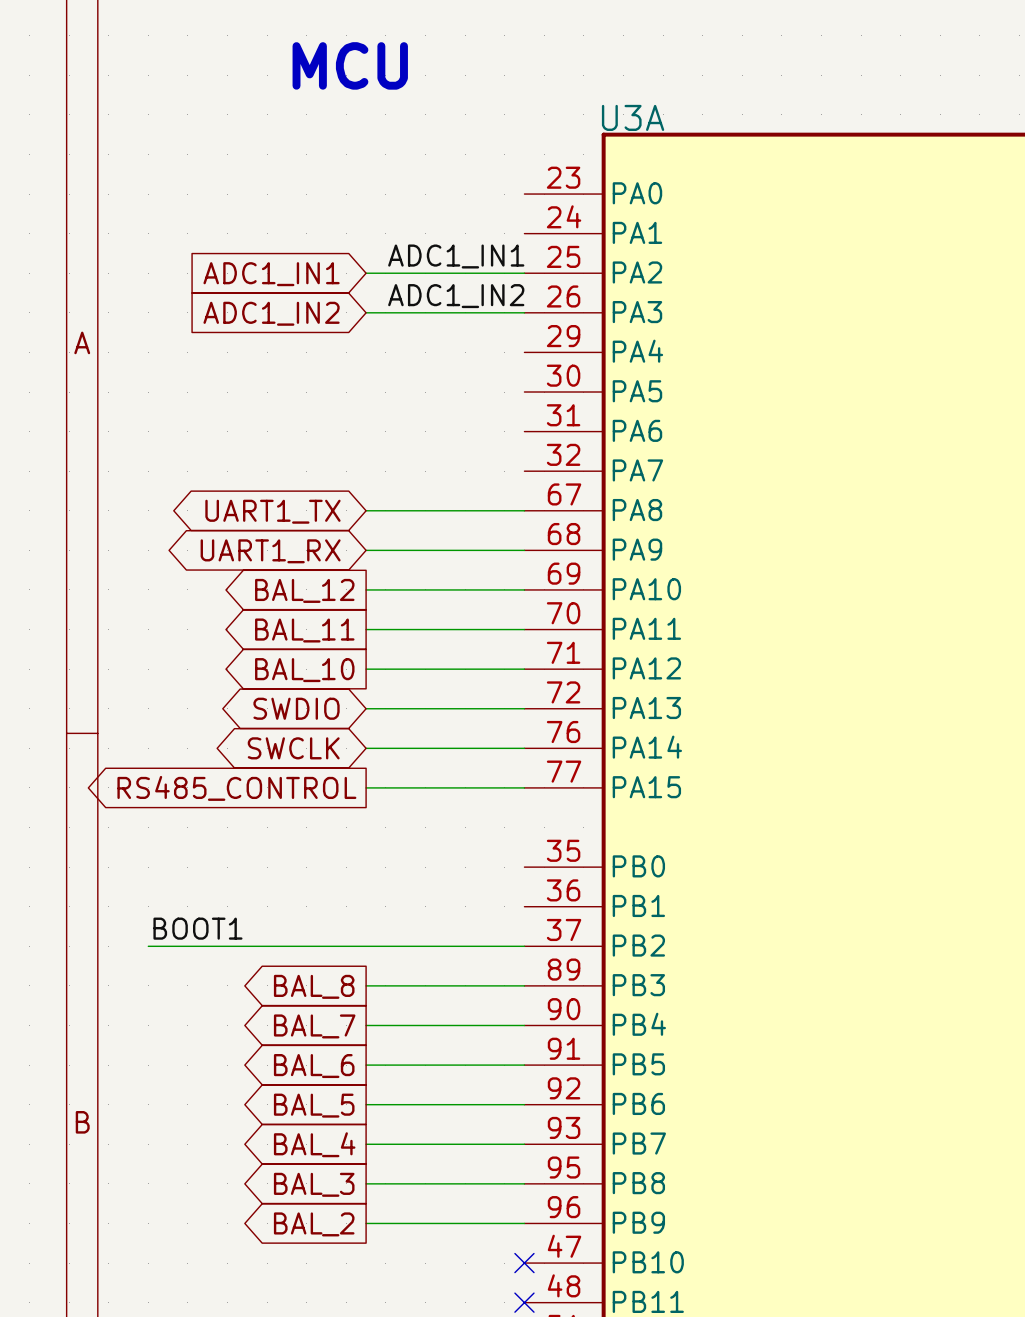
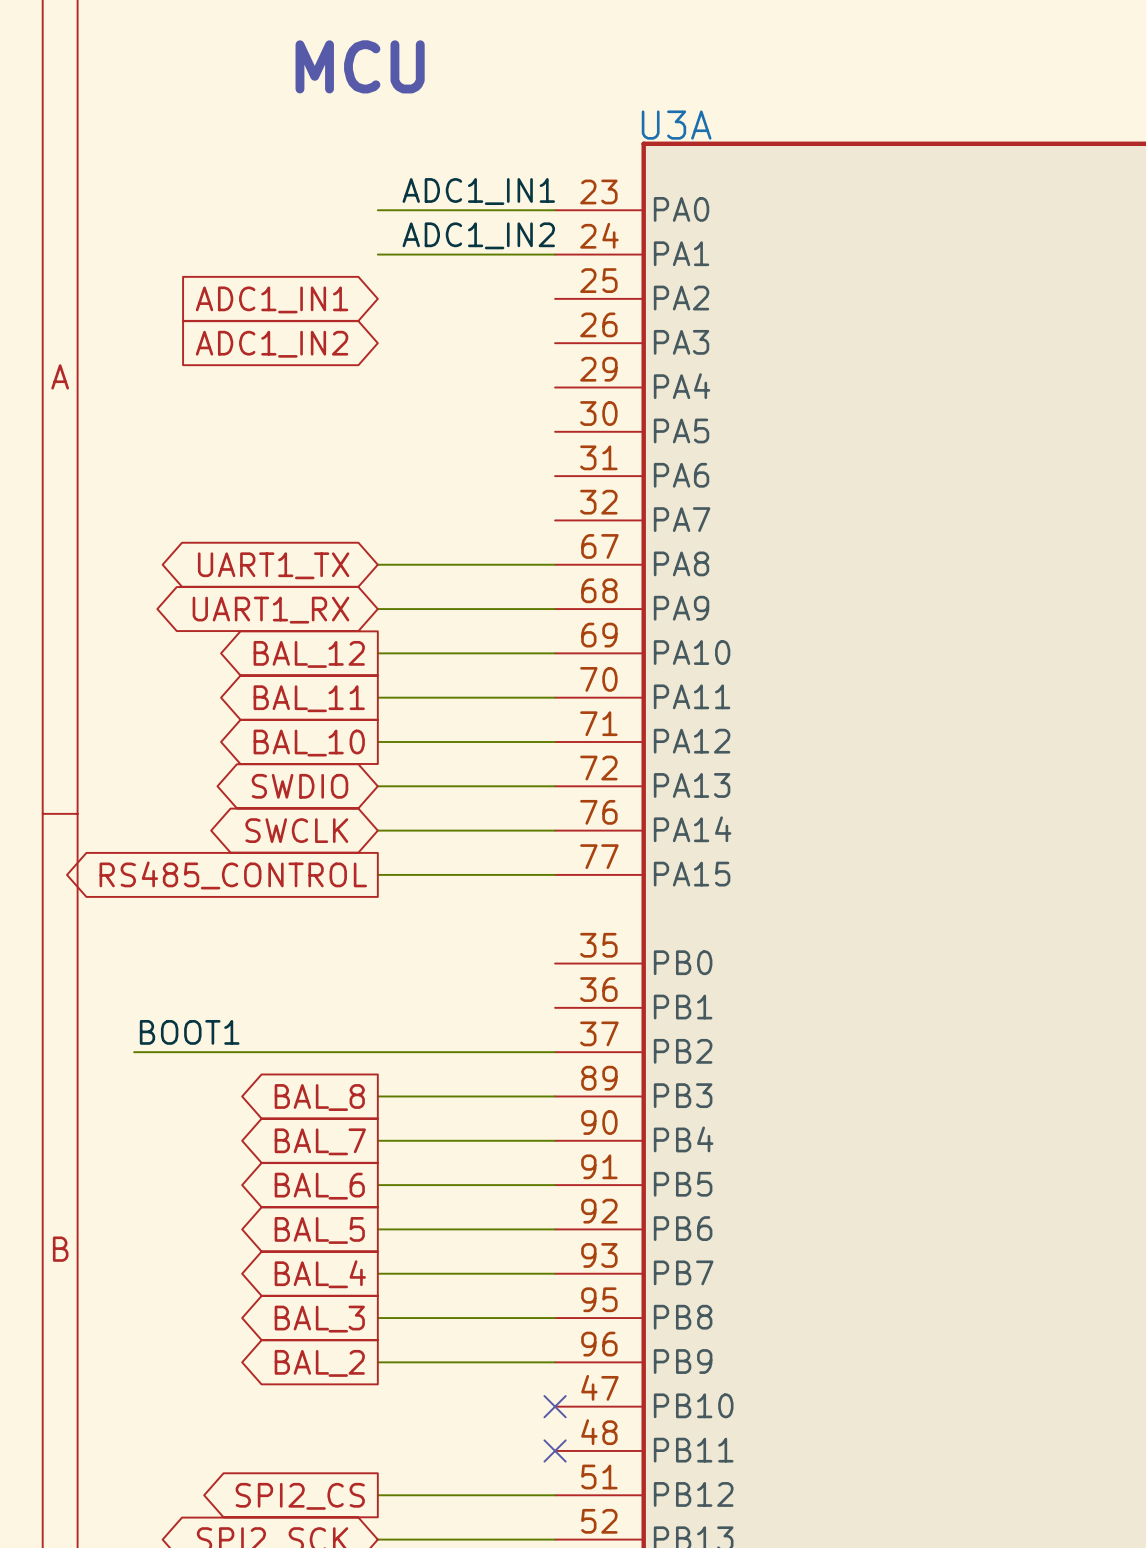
label position: ADC1_IN1 (456, 256) -> ADC1_IN1 (478, 191)
wire: (366, 273) (524, 273) -> (377, 210) (555, 210)
label position: ADC1_IN2 (456, 296) -> ADC1_IN2 (478, 235)
wire: (366, 312) (524, 312) -> (377, 254) (555, 254)

